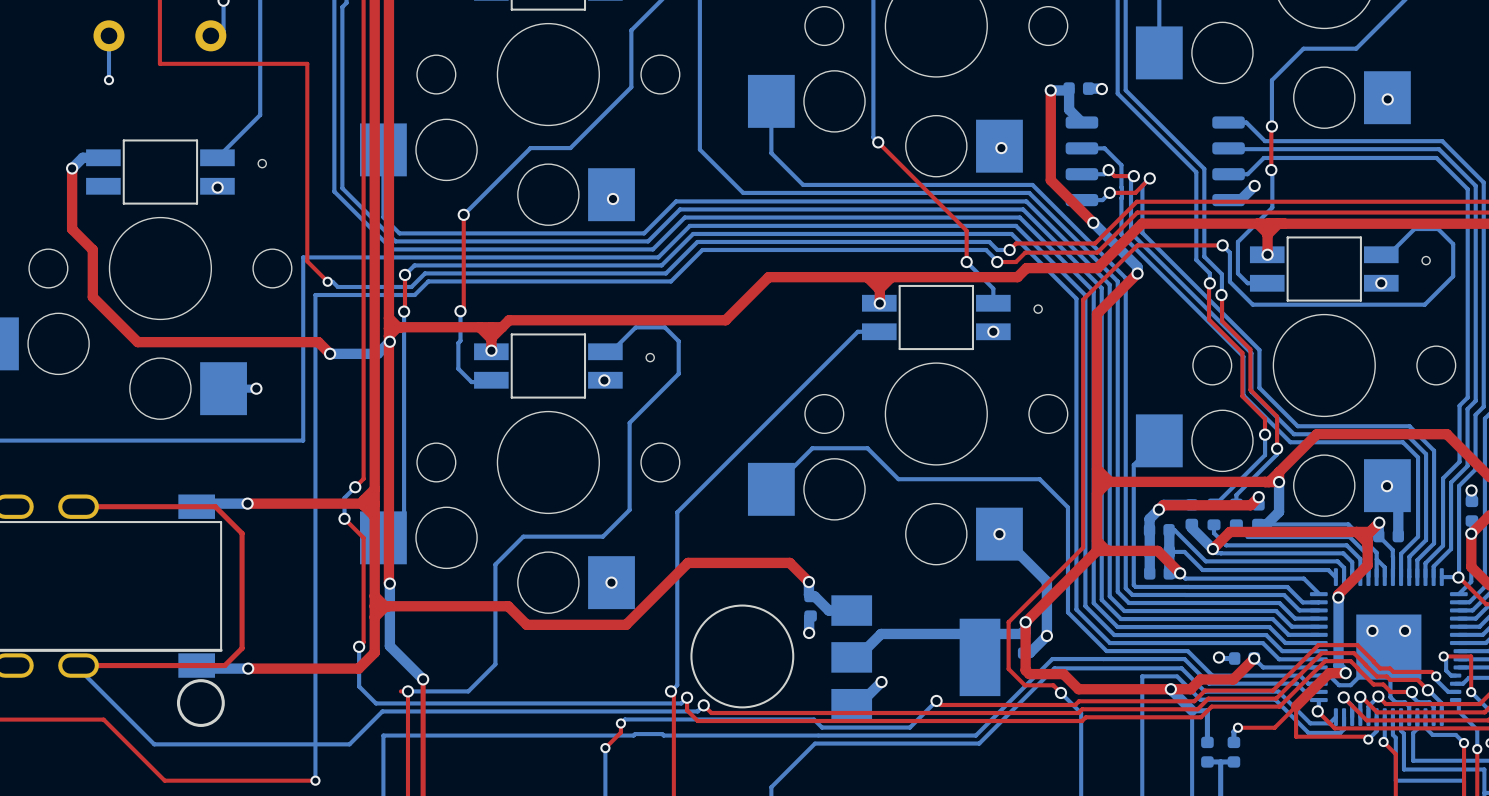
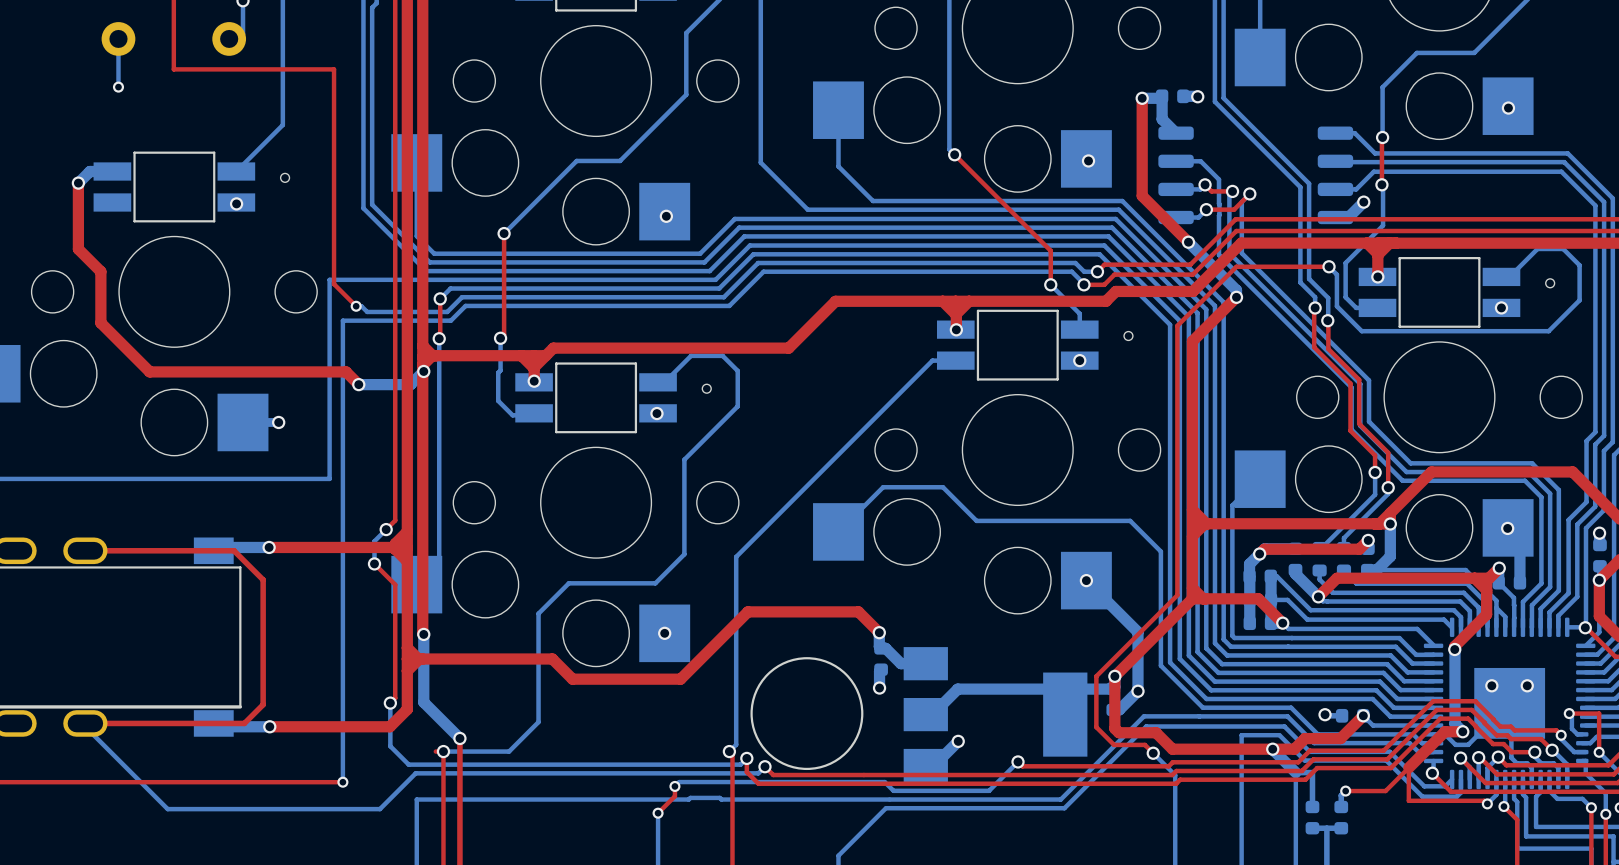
round board edge: [176, 679, 225, 727] -> none
top track: (103, 719) (164, 780) (315, 780) -> (112, 782) (342, 782)
bottom track: (315, 719) (315, 780) -> none
via position: (315, 780) -> (342, 782)

